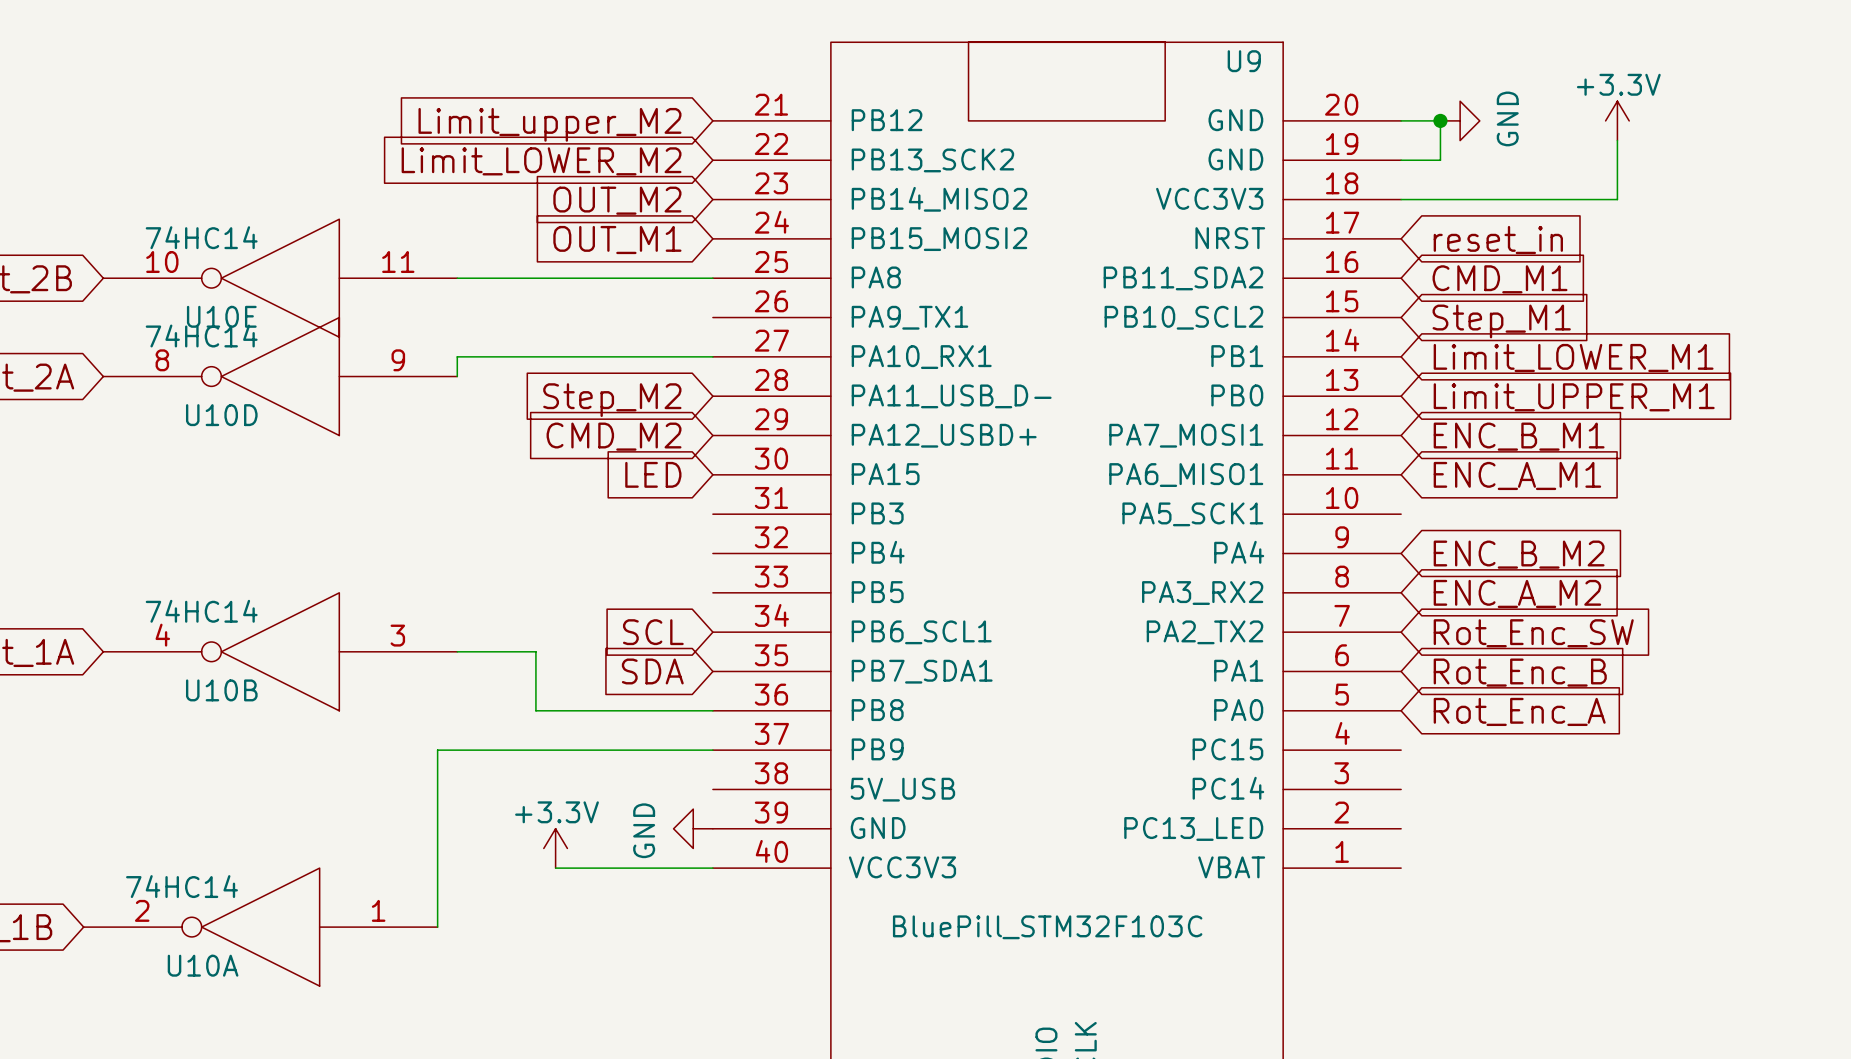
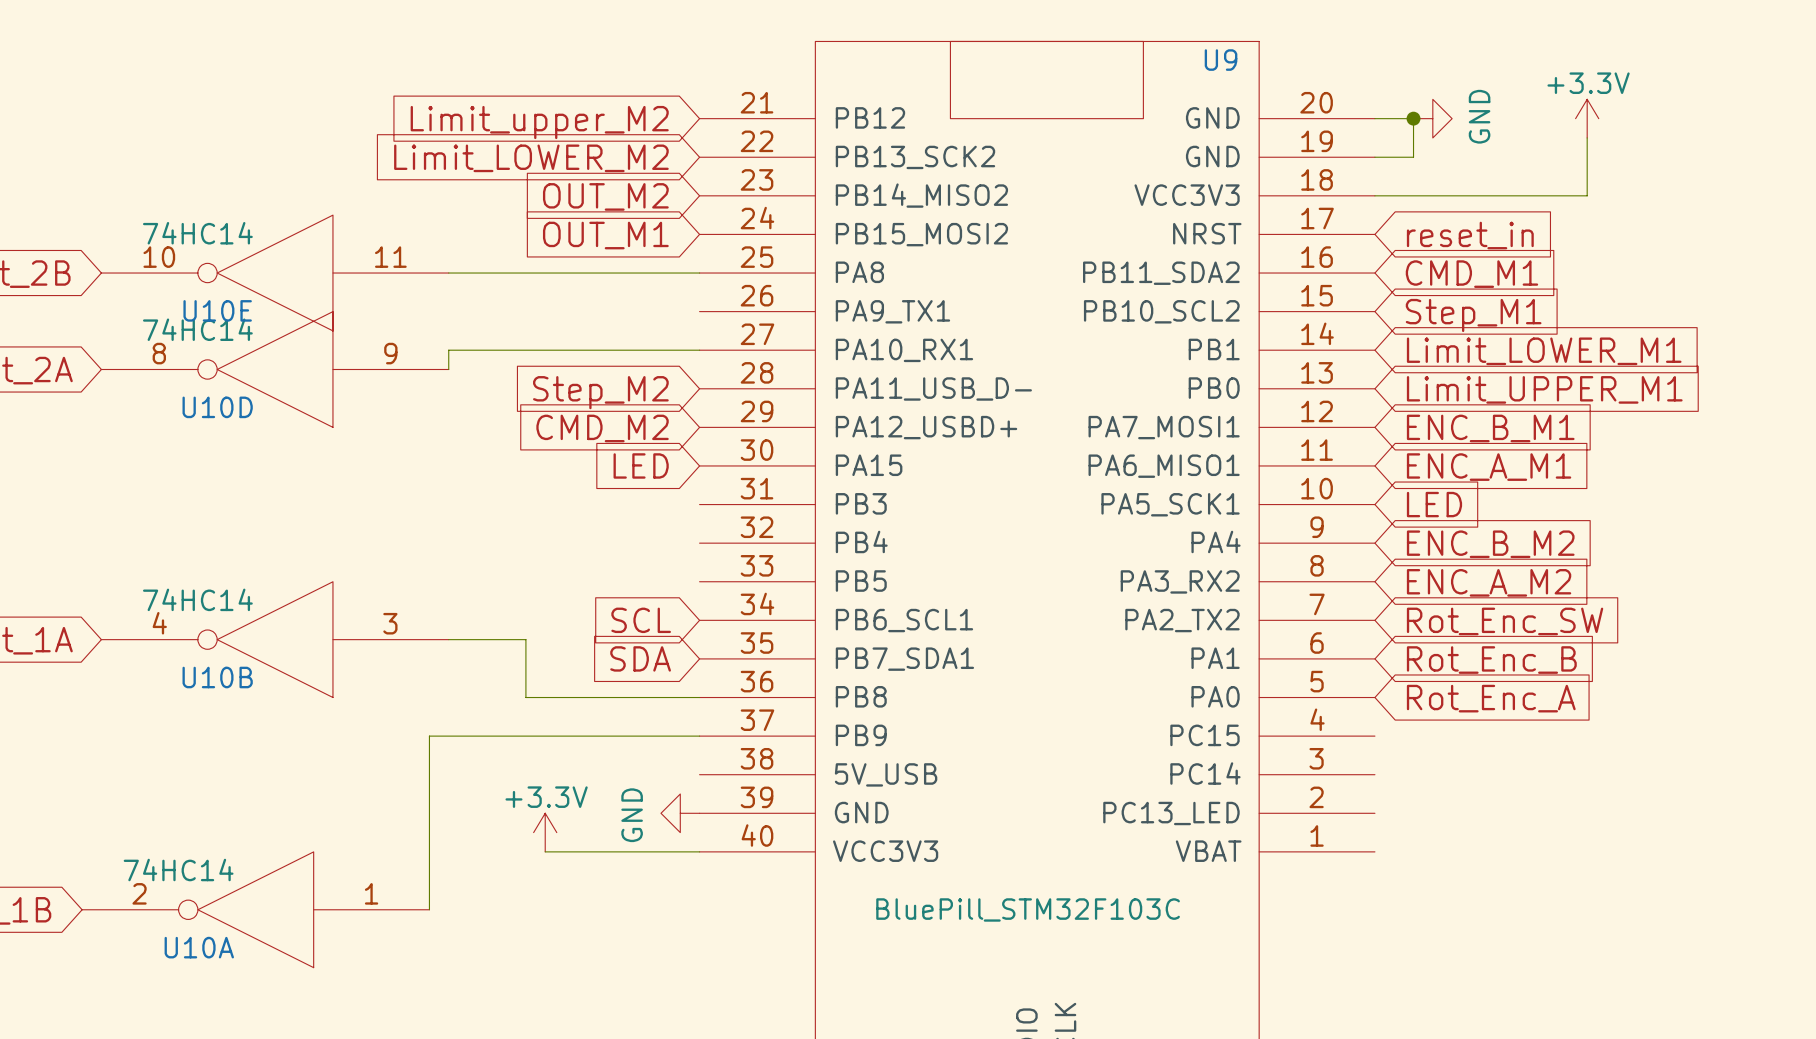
global label: none -> LED (1434, 504)

